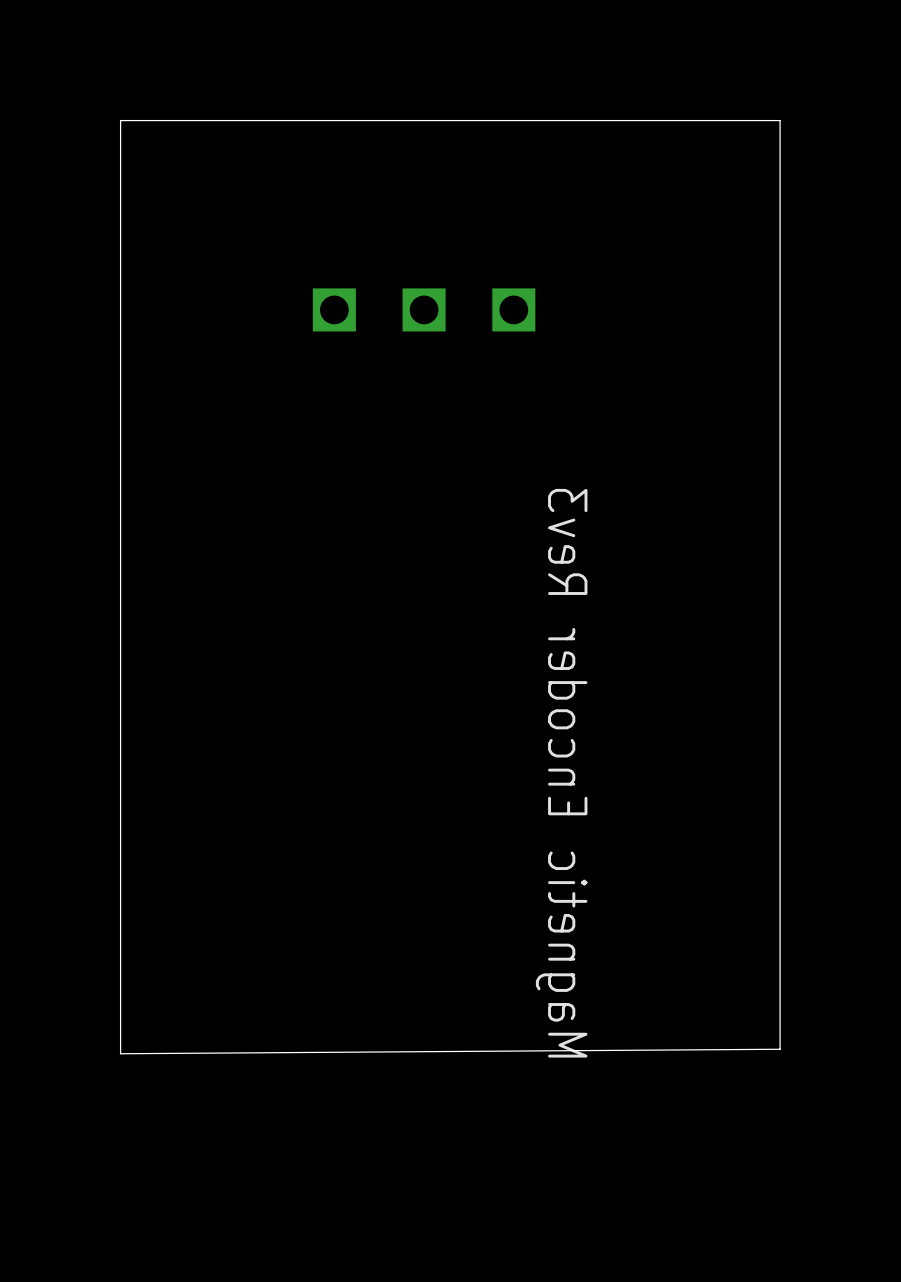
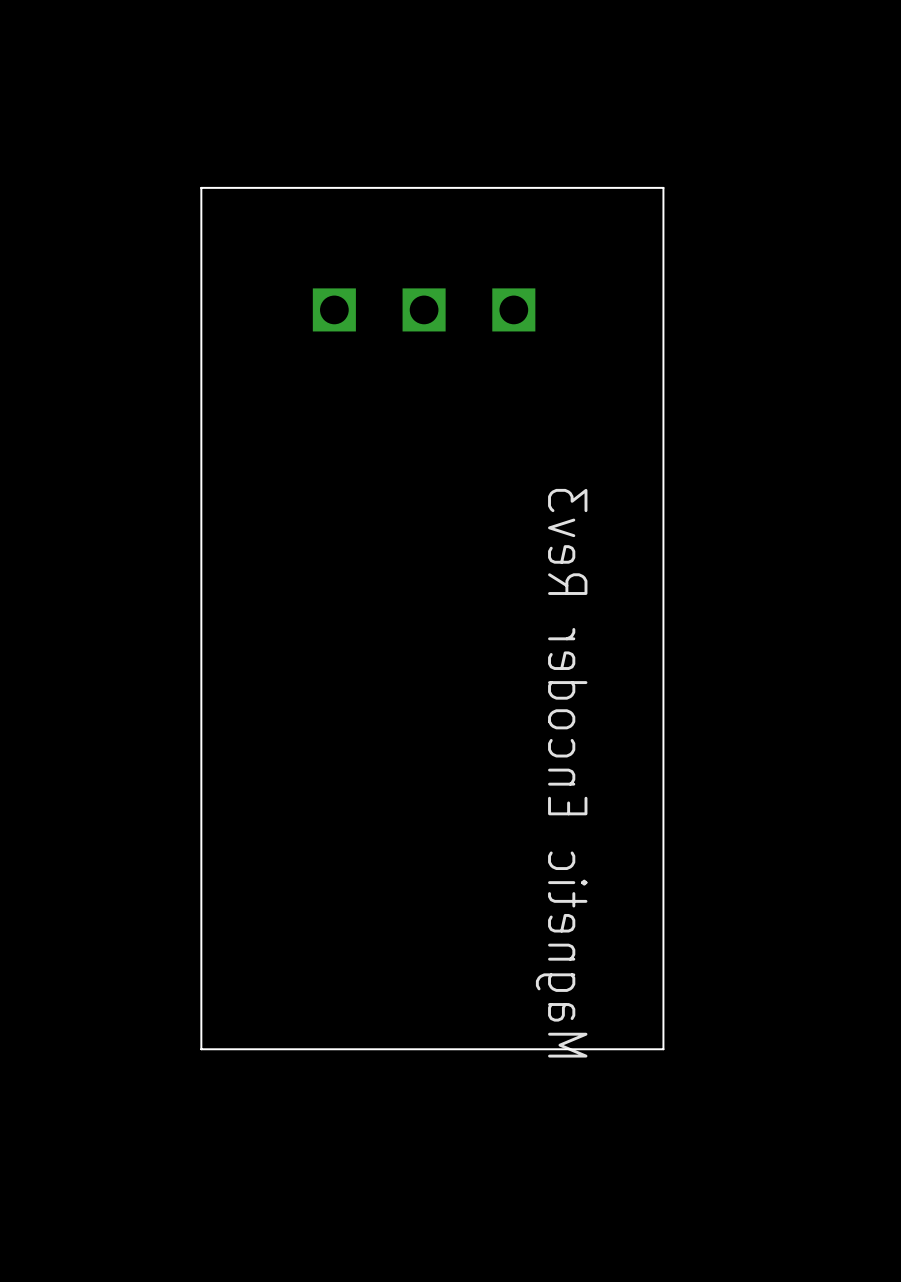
board edge: (780, 120) (780, 1049) (120, 1053) (120, 120) (780, 120) -> (663, 187) (663, 1049) (201, 1049) (201, 187) (663, 187)

